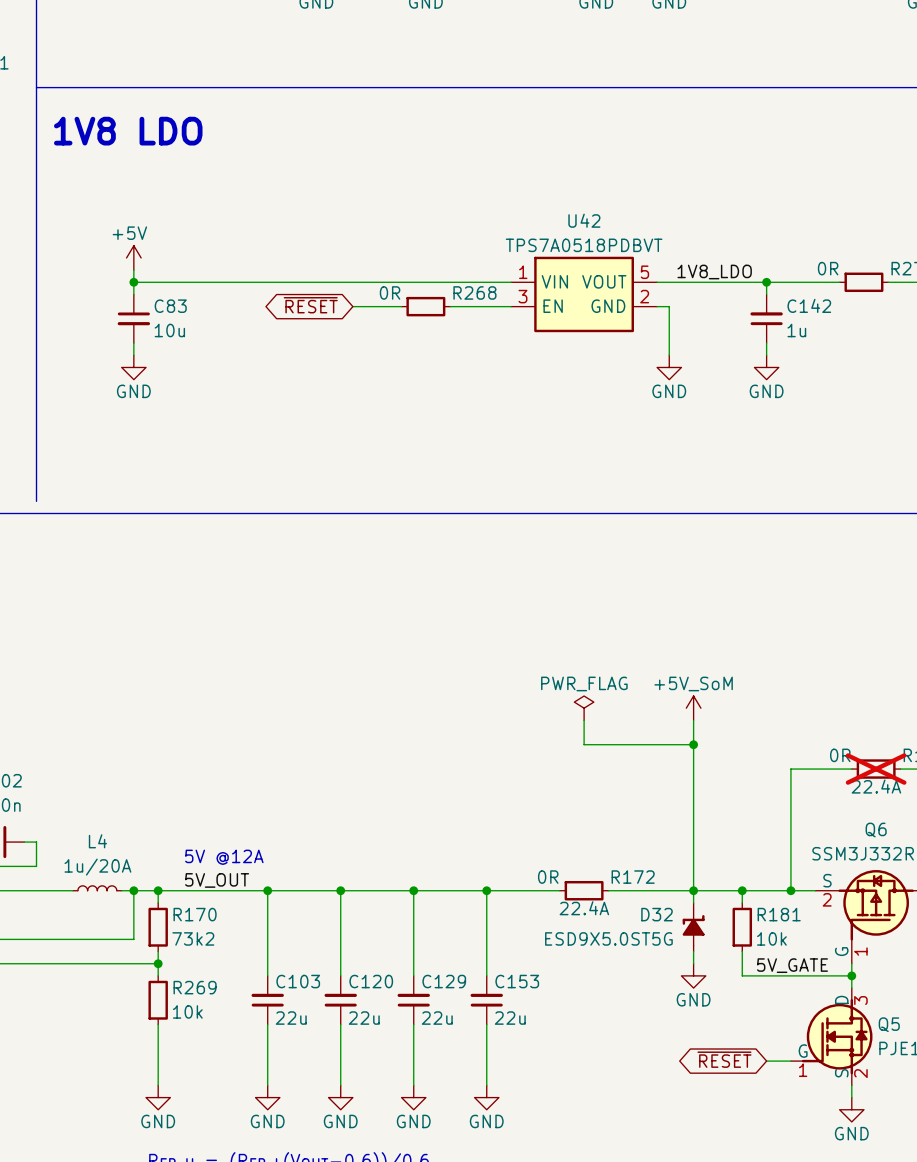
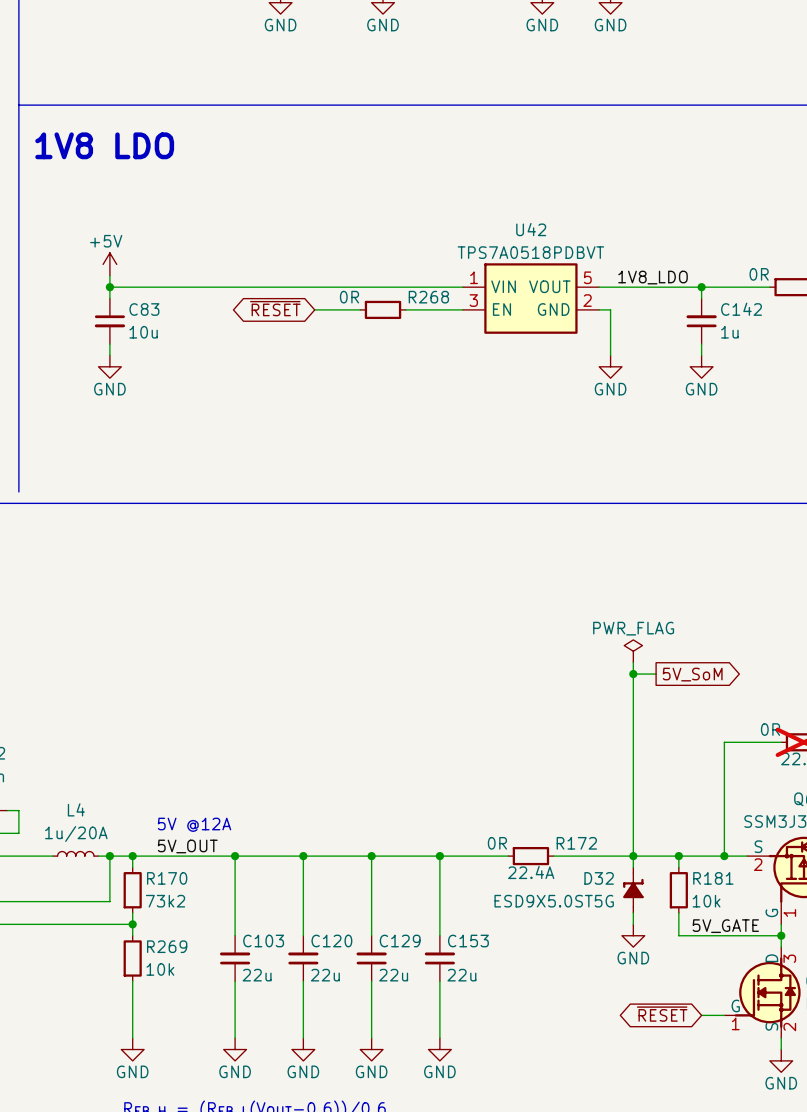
wire: none -> (633, 674) (656, 674)
global label: none -> 5V_SoM (692, 674)
power symbol position: PWR_FLAG (584, 708) -> PWR_FLAG (633, 651)
power symbol: +5V_SoM (693, 708) -> none
wire: (584, 720) (584, 744) (693, 744) -> none
junction position: (693, 744) -> (633, 674)

